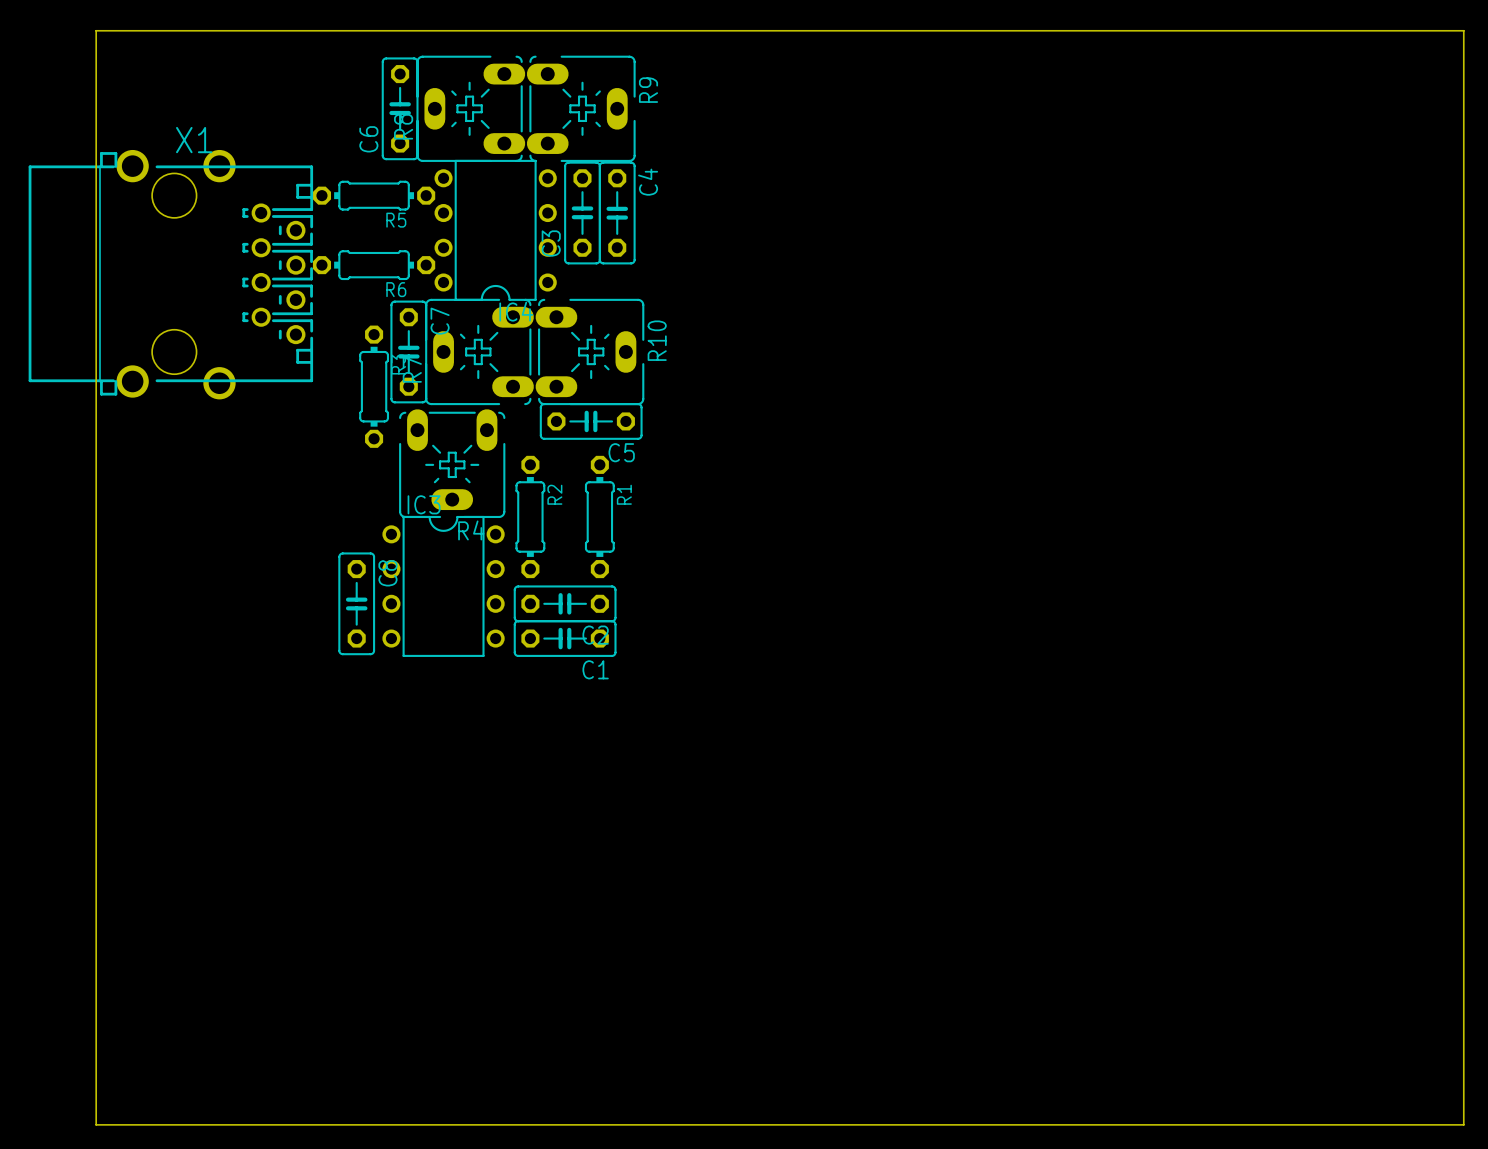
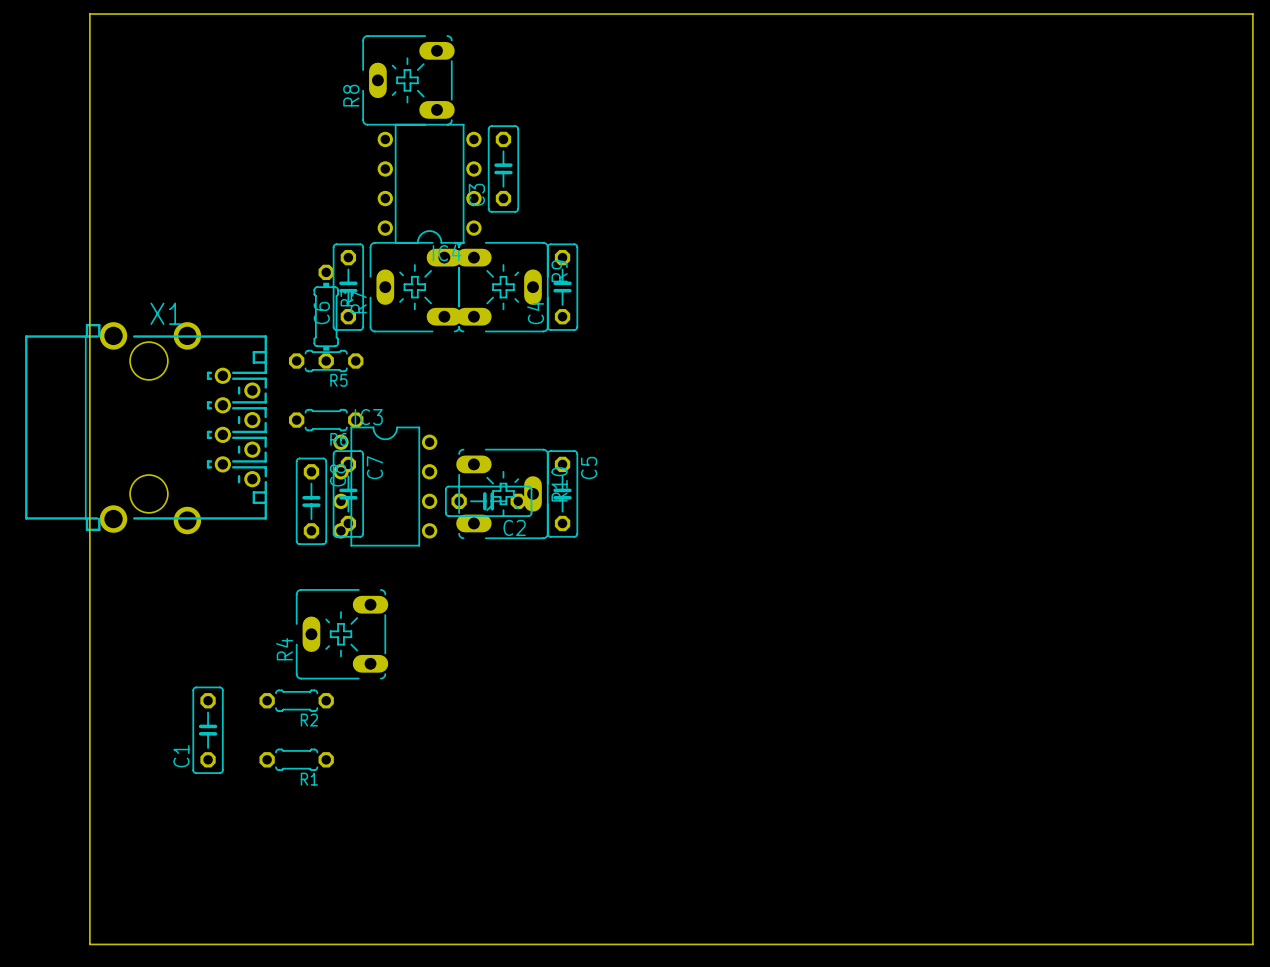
C6 position: (400, 108) -> (348, 287)
R9 position: (581, 108) -> (502, 287)
R5 footprint: [312, 180, 436, 211] -> [288, 349, 364, 373]
C4 rotation: 0° (617, 213) -> 180° (562, 287)
C4 position: (617, 213) -> (562, 287)
R6 footprint: [312, 250, 436, 281] -> [288, 408, 364, 432]
X1 position: (170, 274) -> (146, 428)
C7 position: (408, 351) -> (348, 493)
R10 position: (589, 351) -> (502, 493)
C5 rotation: 0° (591, 421) -> 90° counterclockwise (562, 493)
C5 position: (591, 421) -> (562, 493)
R2 footprint: [515, 455, 546, 579] -> [259, 689, 334, 712]
R1 footprint: [584, 455, 615, 579] -> [259, 748, 334, 772]
R4 rotation: 0° (452, 463) -> 90° clockwise (342, 634)
R4 position: (452, 463) -> (342, 634)
R2 name position: R2 (554, 494) -> R2 (309, 720)
R1 name position: R1 (624, 494) -> R1 (309, 779)
C1 rotation: 0° (565, 638) -> 90° clockwise (208, 730)
C1 position: (565, 638) -> (208, 730)

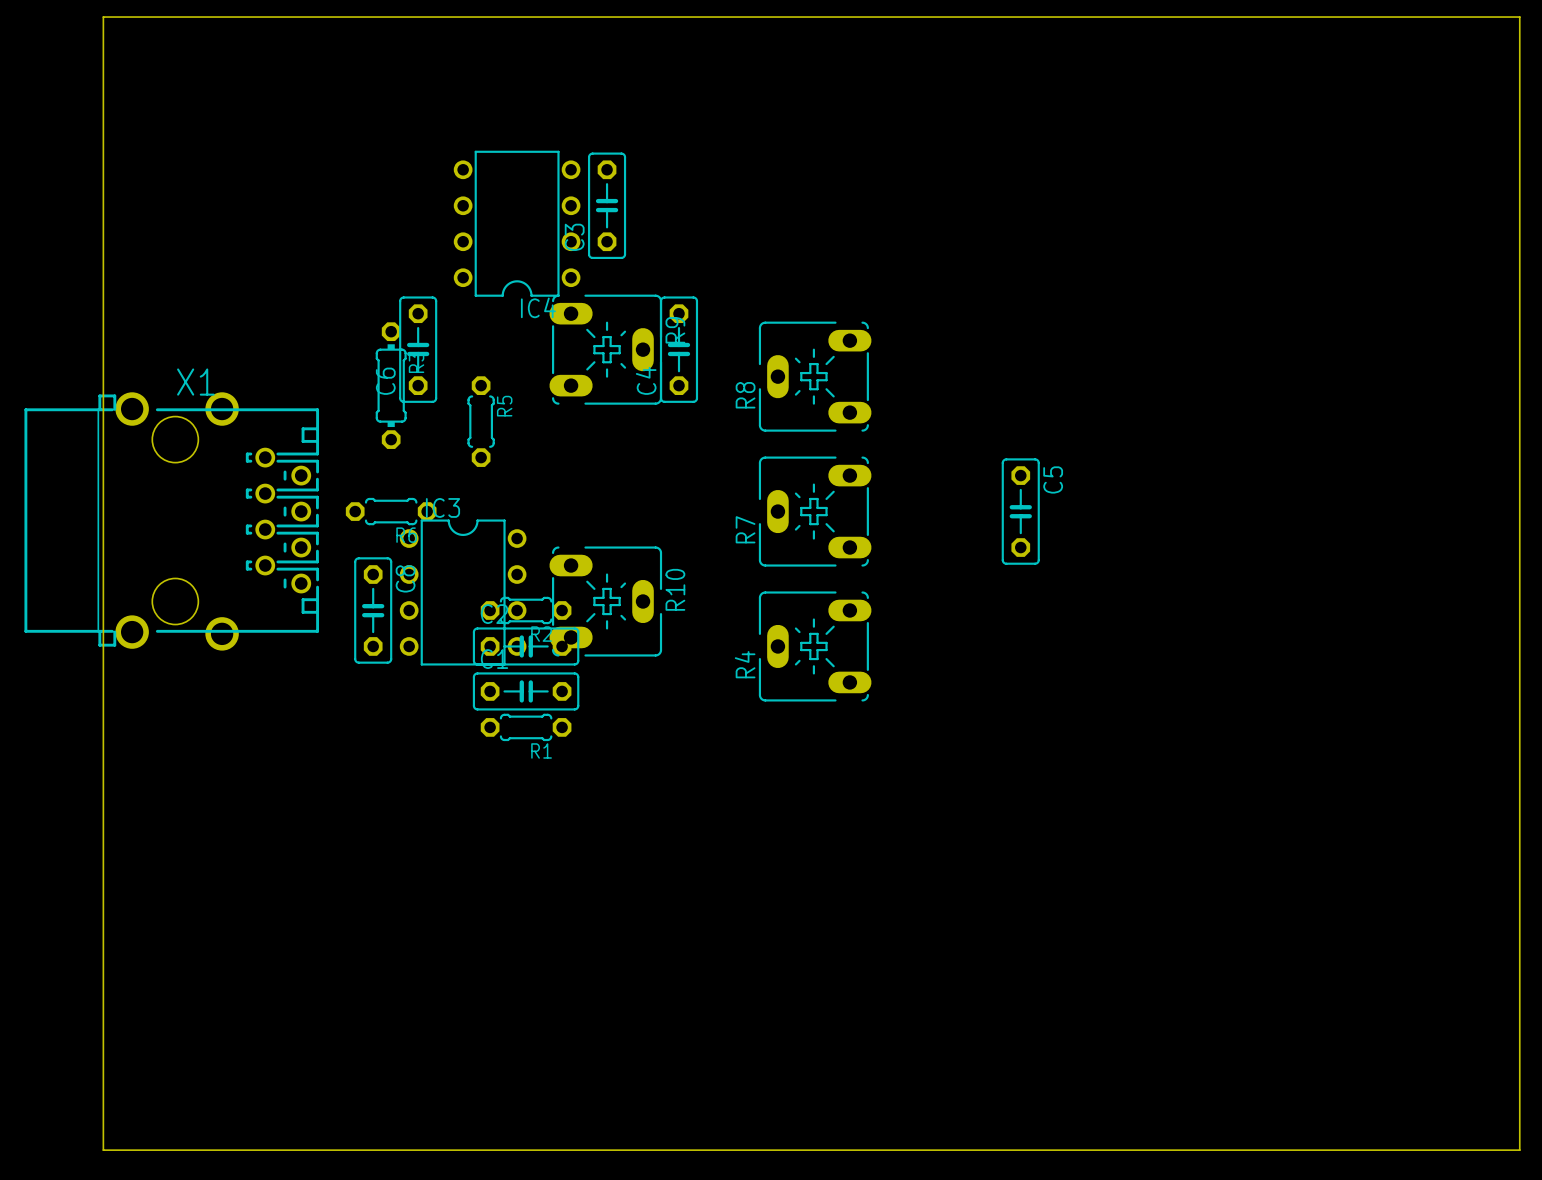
R8 position: (408, 80) -> (815, 376)
R7 position: (415, 287) -> (815, 511)
R5 rotation: 0° (326, 361) -> 90° clockwise (481, 421)
R5 position: (326, 361) -> (481, 421)
R5 name position: R5 (338, 380) -> R5 (504, 406)
C7: (348, 493) -> none
C5 position: (562, 493) -> (1020, 511)
C2 rotation: 0° (488, 501) -> 180° (526, 646)
C2 position: (488, 501) -> (526, 646)
R4 position: (342, 634) -> (815, 646)
R2 position: (296, 700) -> (526, 610)
C1 rotation: 0° (208, 730) -> 90° clockwise (526, 691)
C1 position: (208, 730) -> (526, 691)
R1 position: (296, 759) -> (526, 727)

